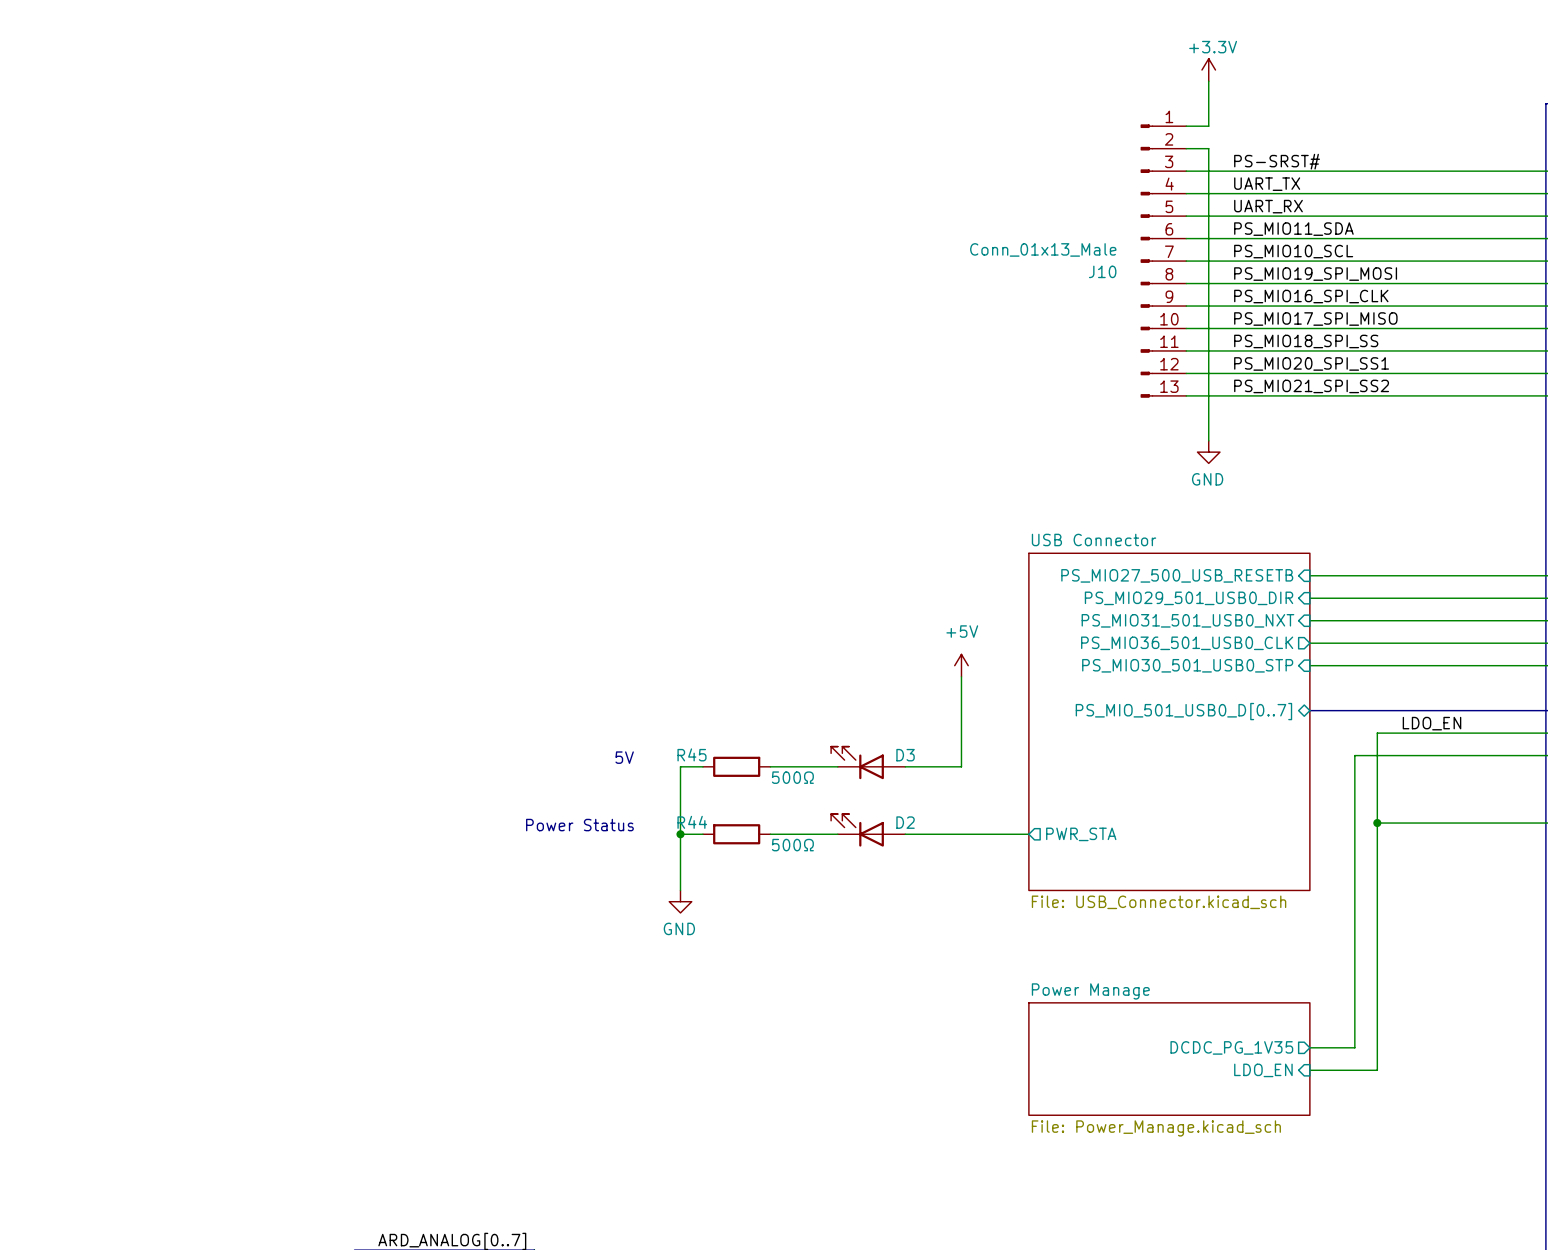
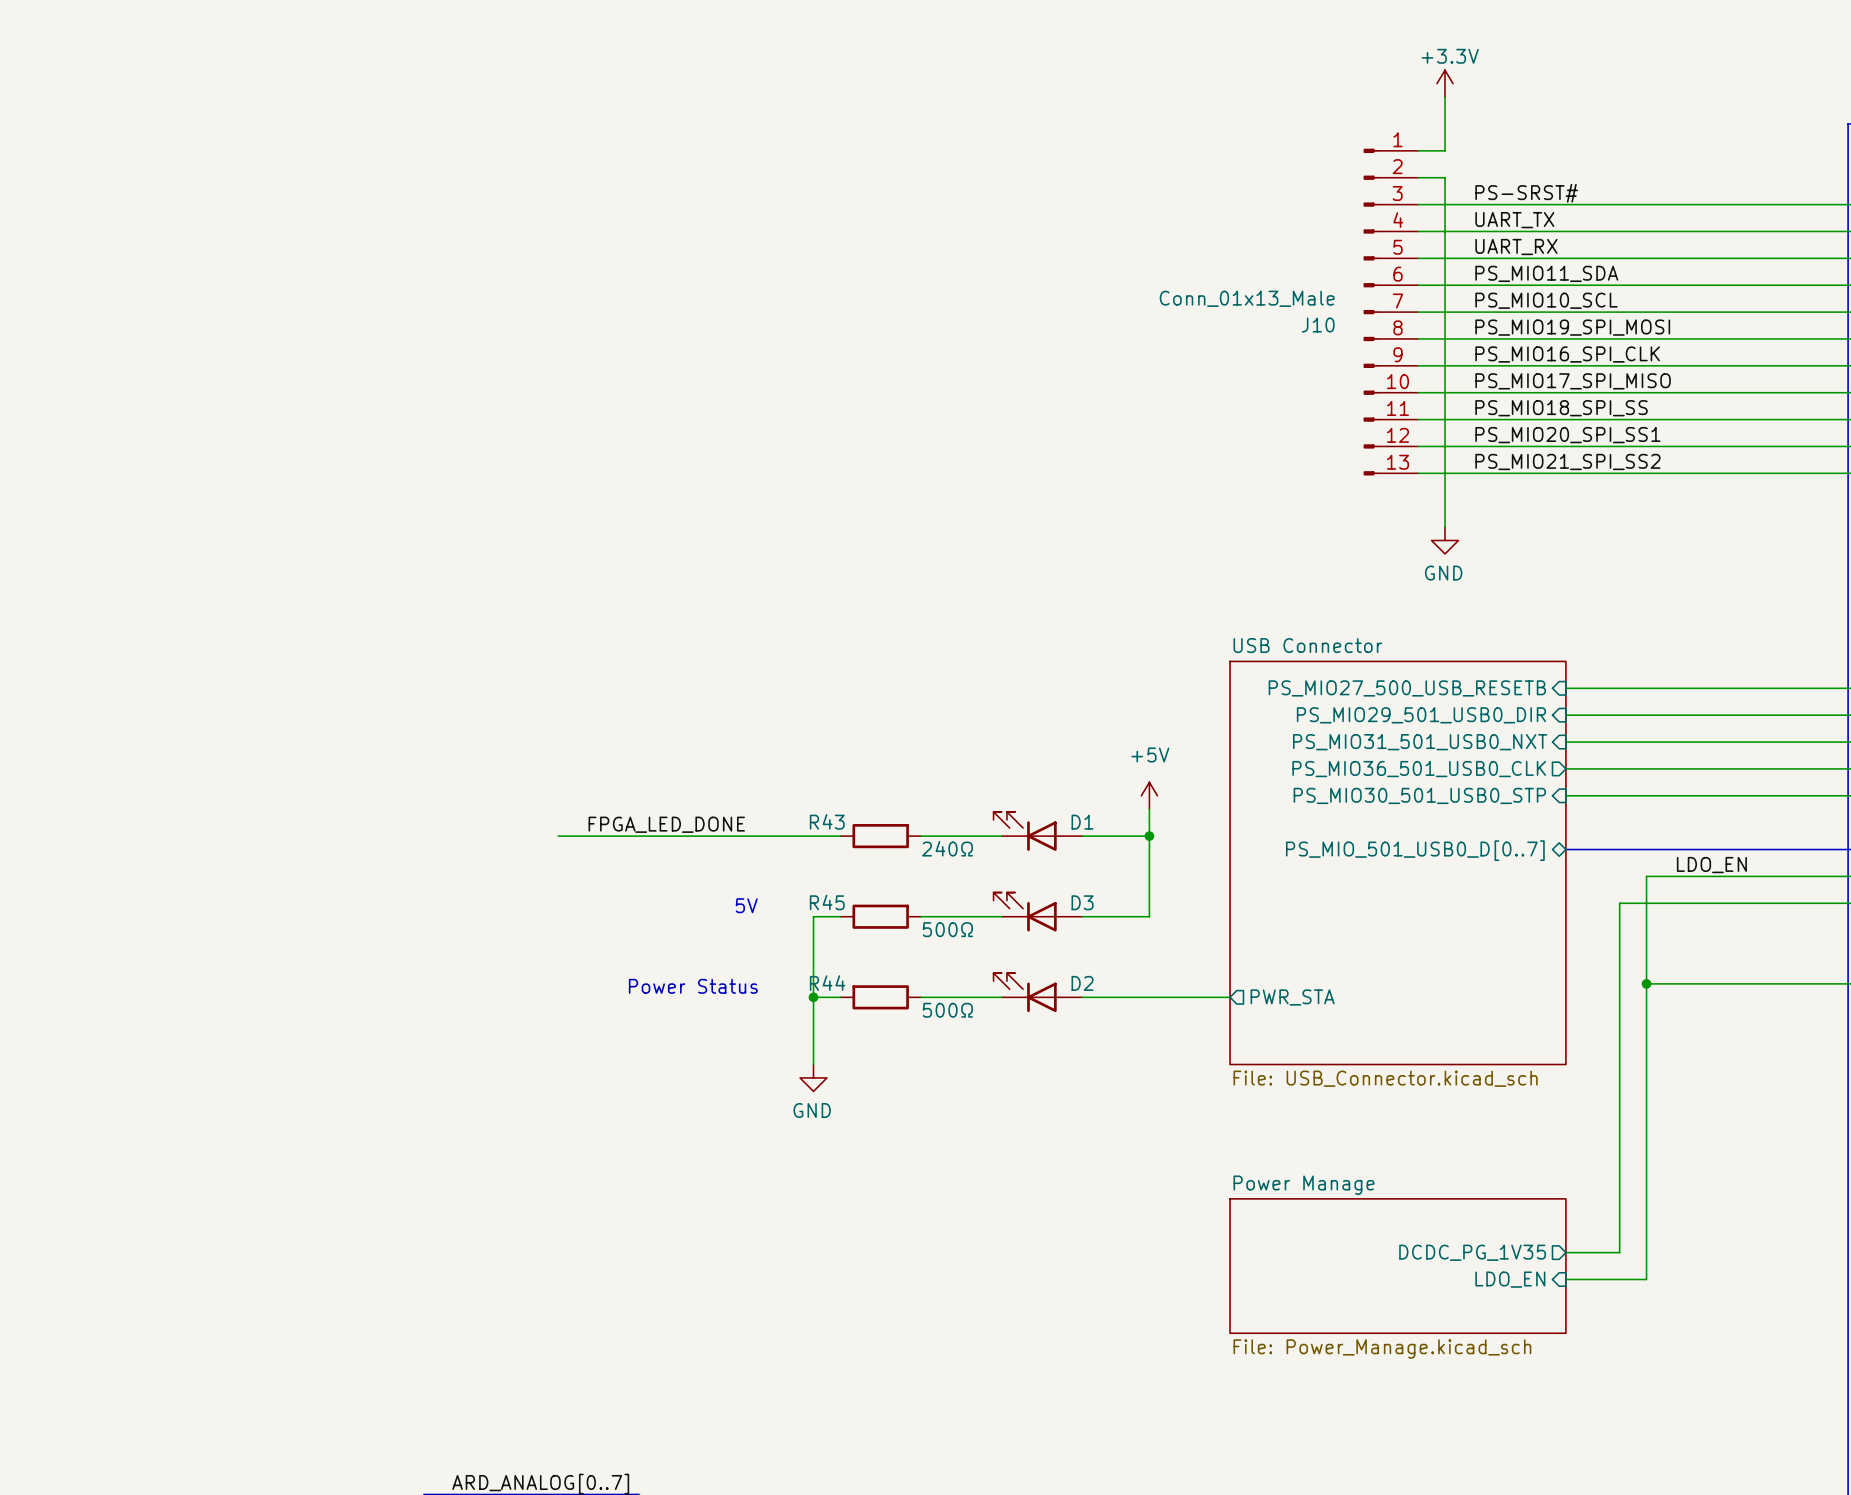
label: none -> FPGA_LED_DONE (666, 824)
D1: none -> (1037, 831)
wire: none -> (558, 836) (840, 836)
R43: none -> 240Ω (880, 836)
wire: none -> (920, 836) (1001, 836)
wire: none -> (1082, 836) (1149, 836)
junction: none -> (1149, 836)

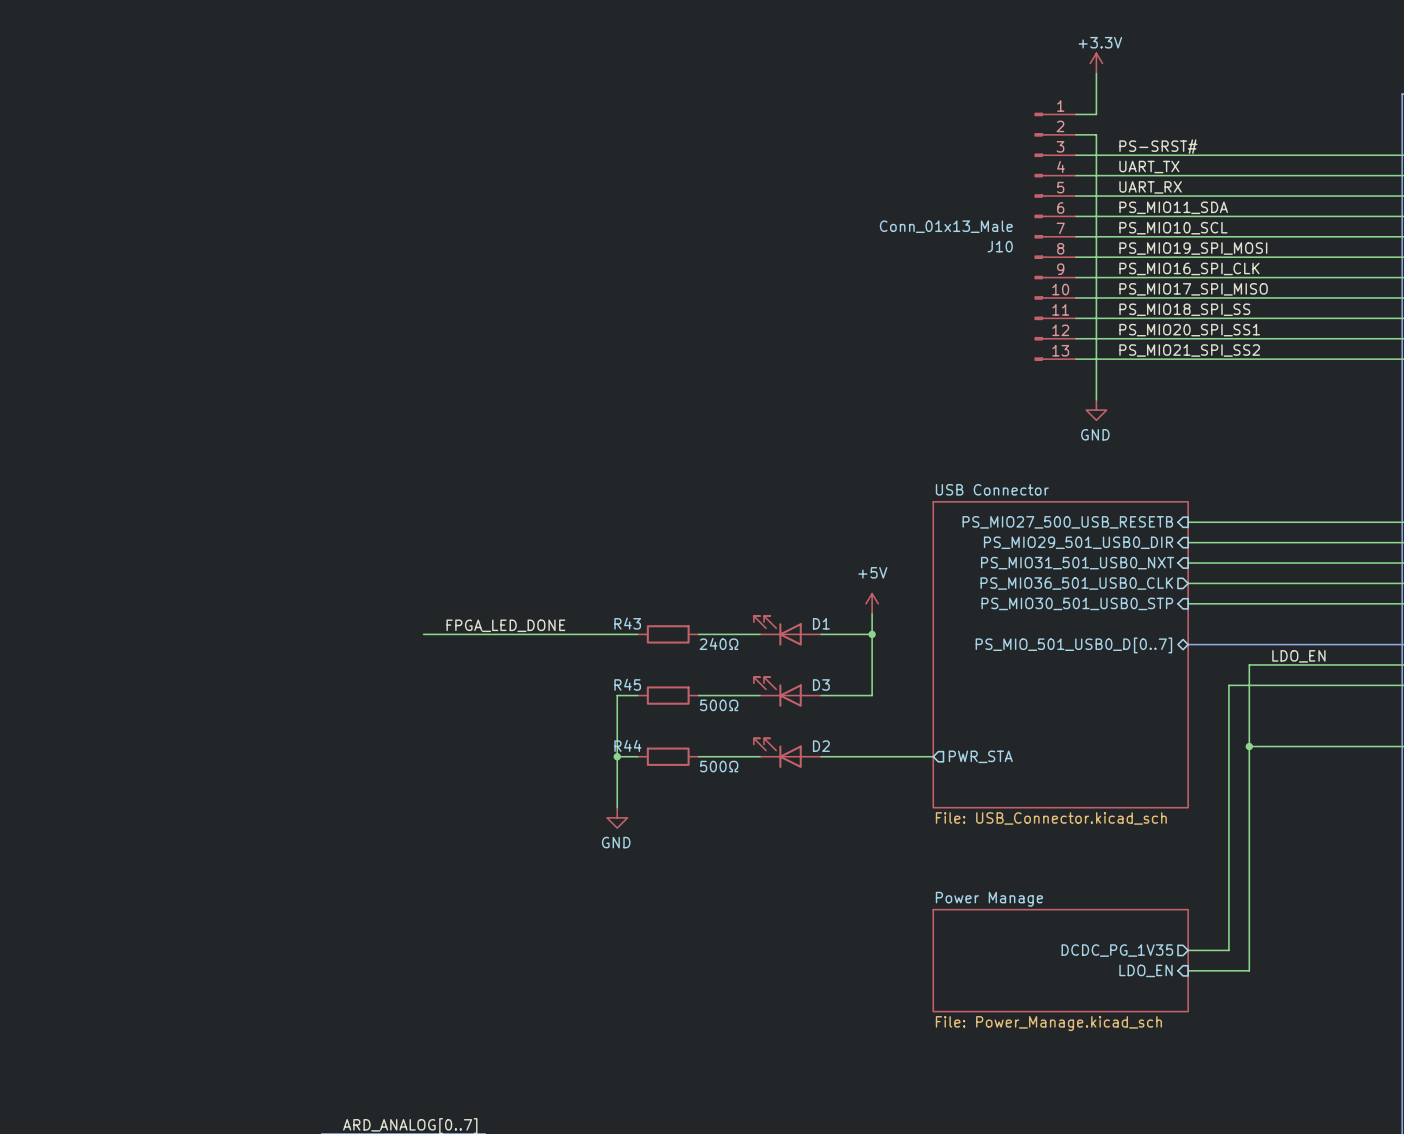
text: 5V (746, 905) -> none
text: Power Status (693, 986) -> none

